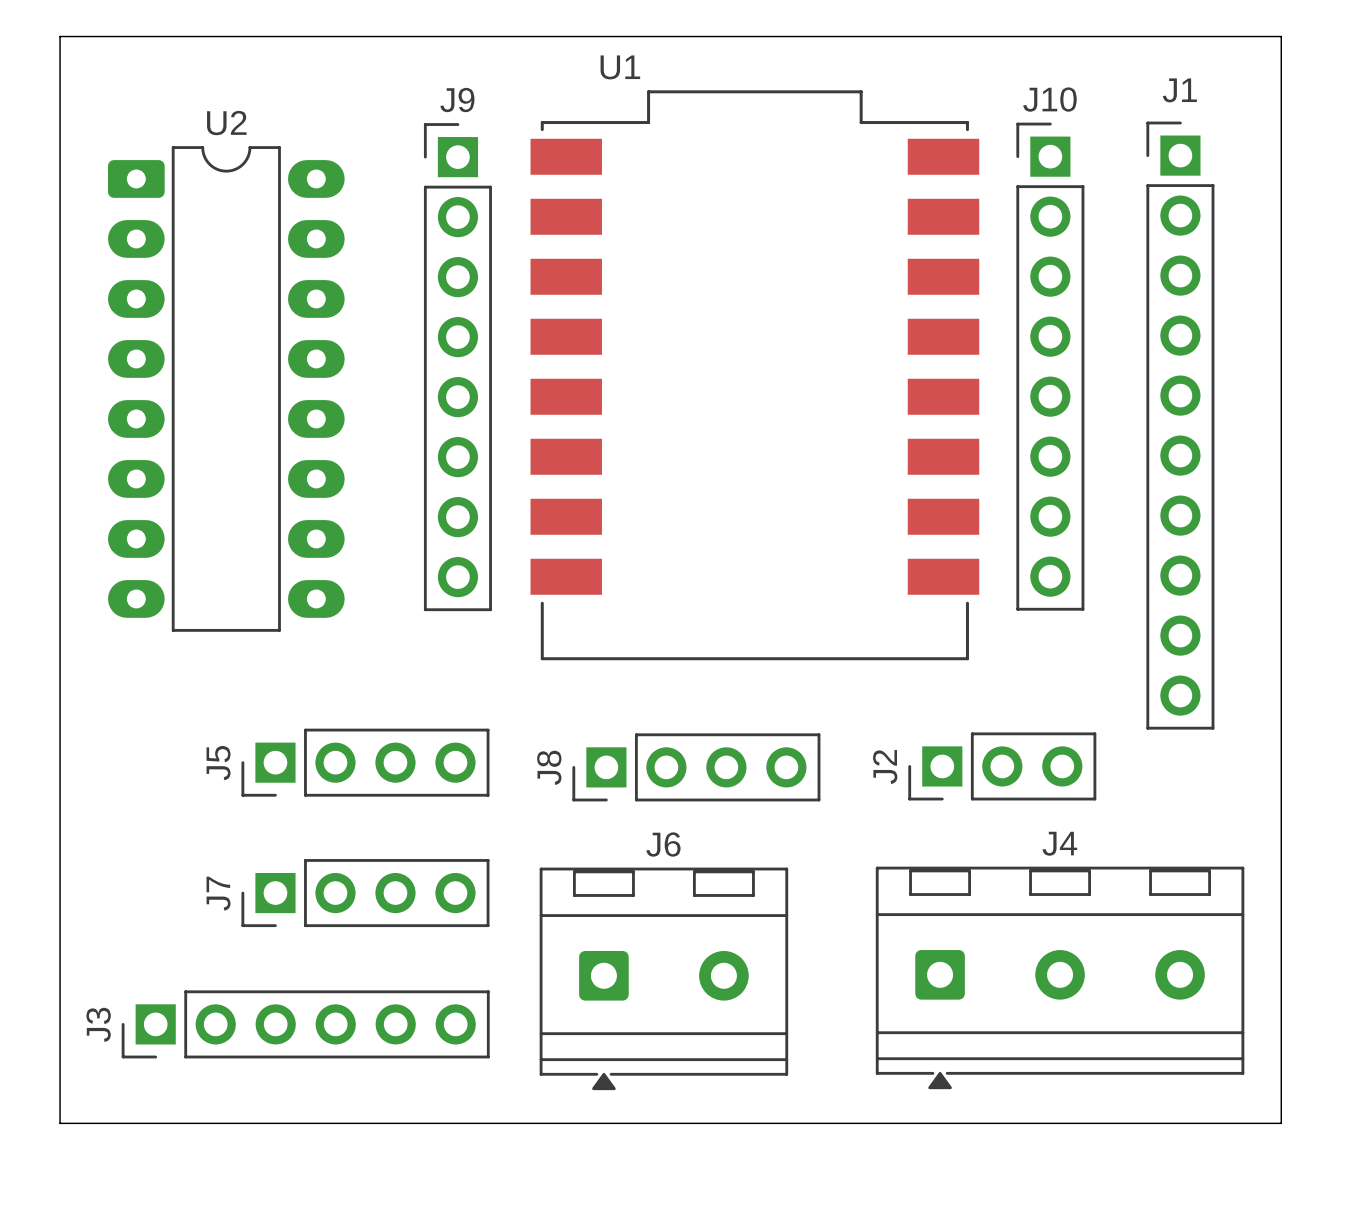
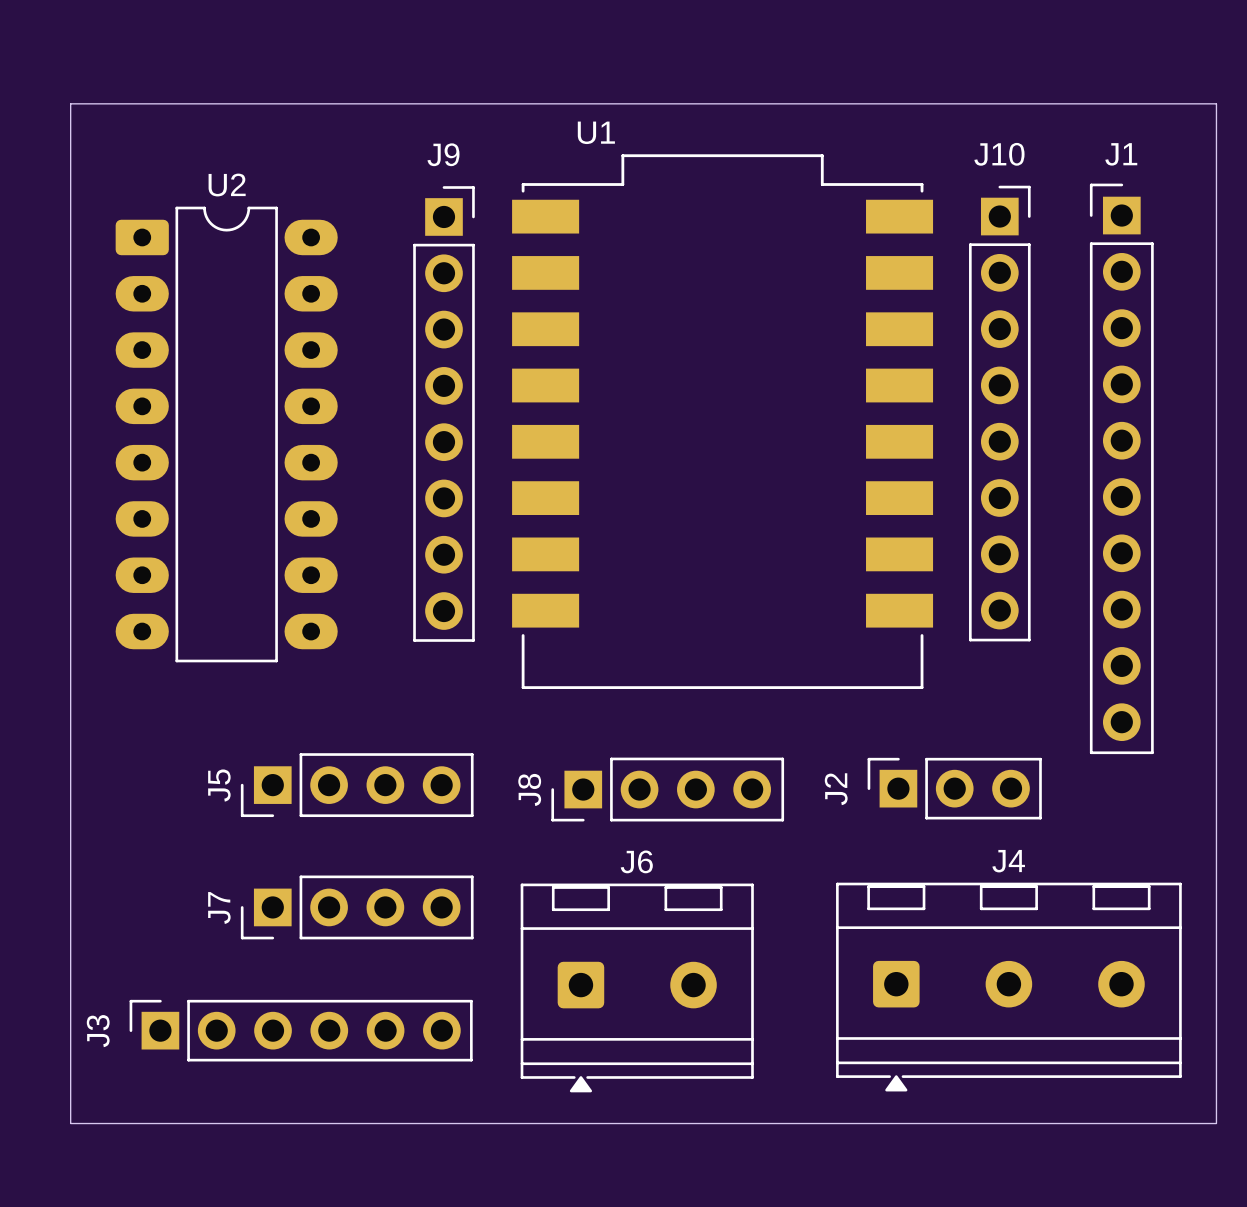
J10 footprint: [1016, 122, 1085, 611] -> [969, 185, 1031, 642]
J9 footprint: [423, 123, 492, 612] -> [413, 186, 475, 642]
J2 footprint: [908, 732, 1097, 801] -> [867, 757, 1042, 820]
J3 footprint: [121, 990, 490, 1059] -> [129, 999, 473, 1062]

